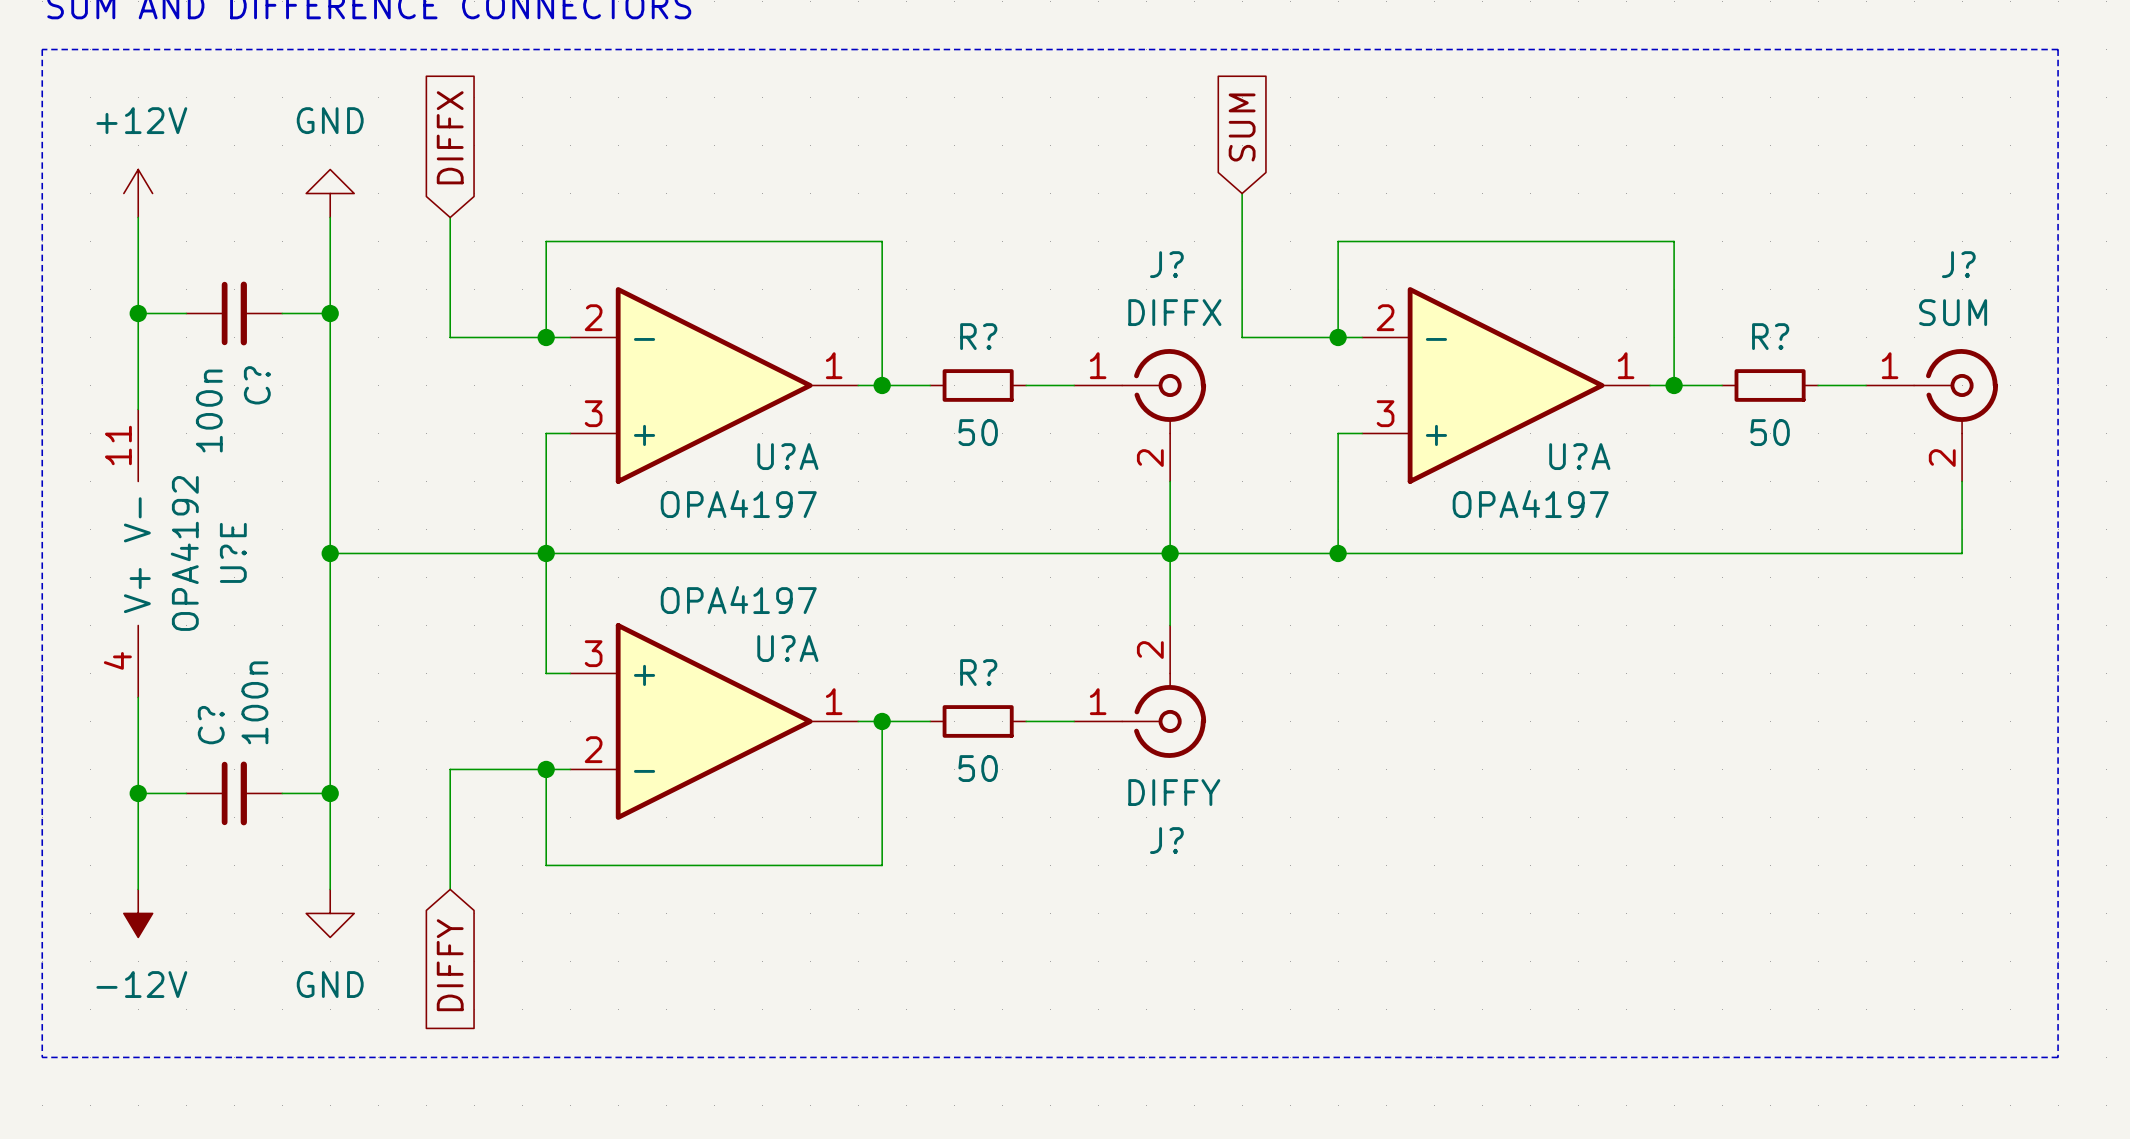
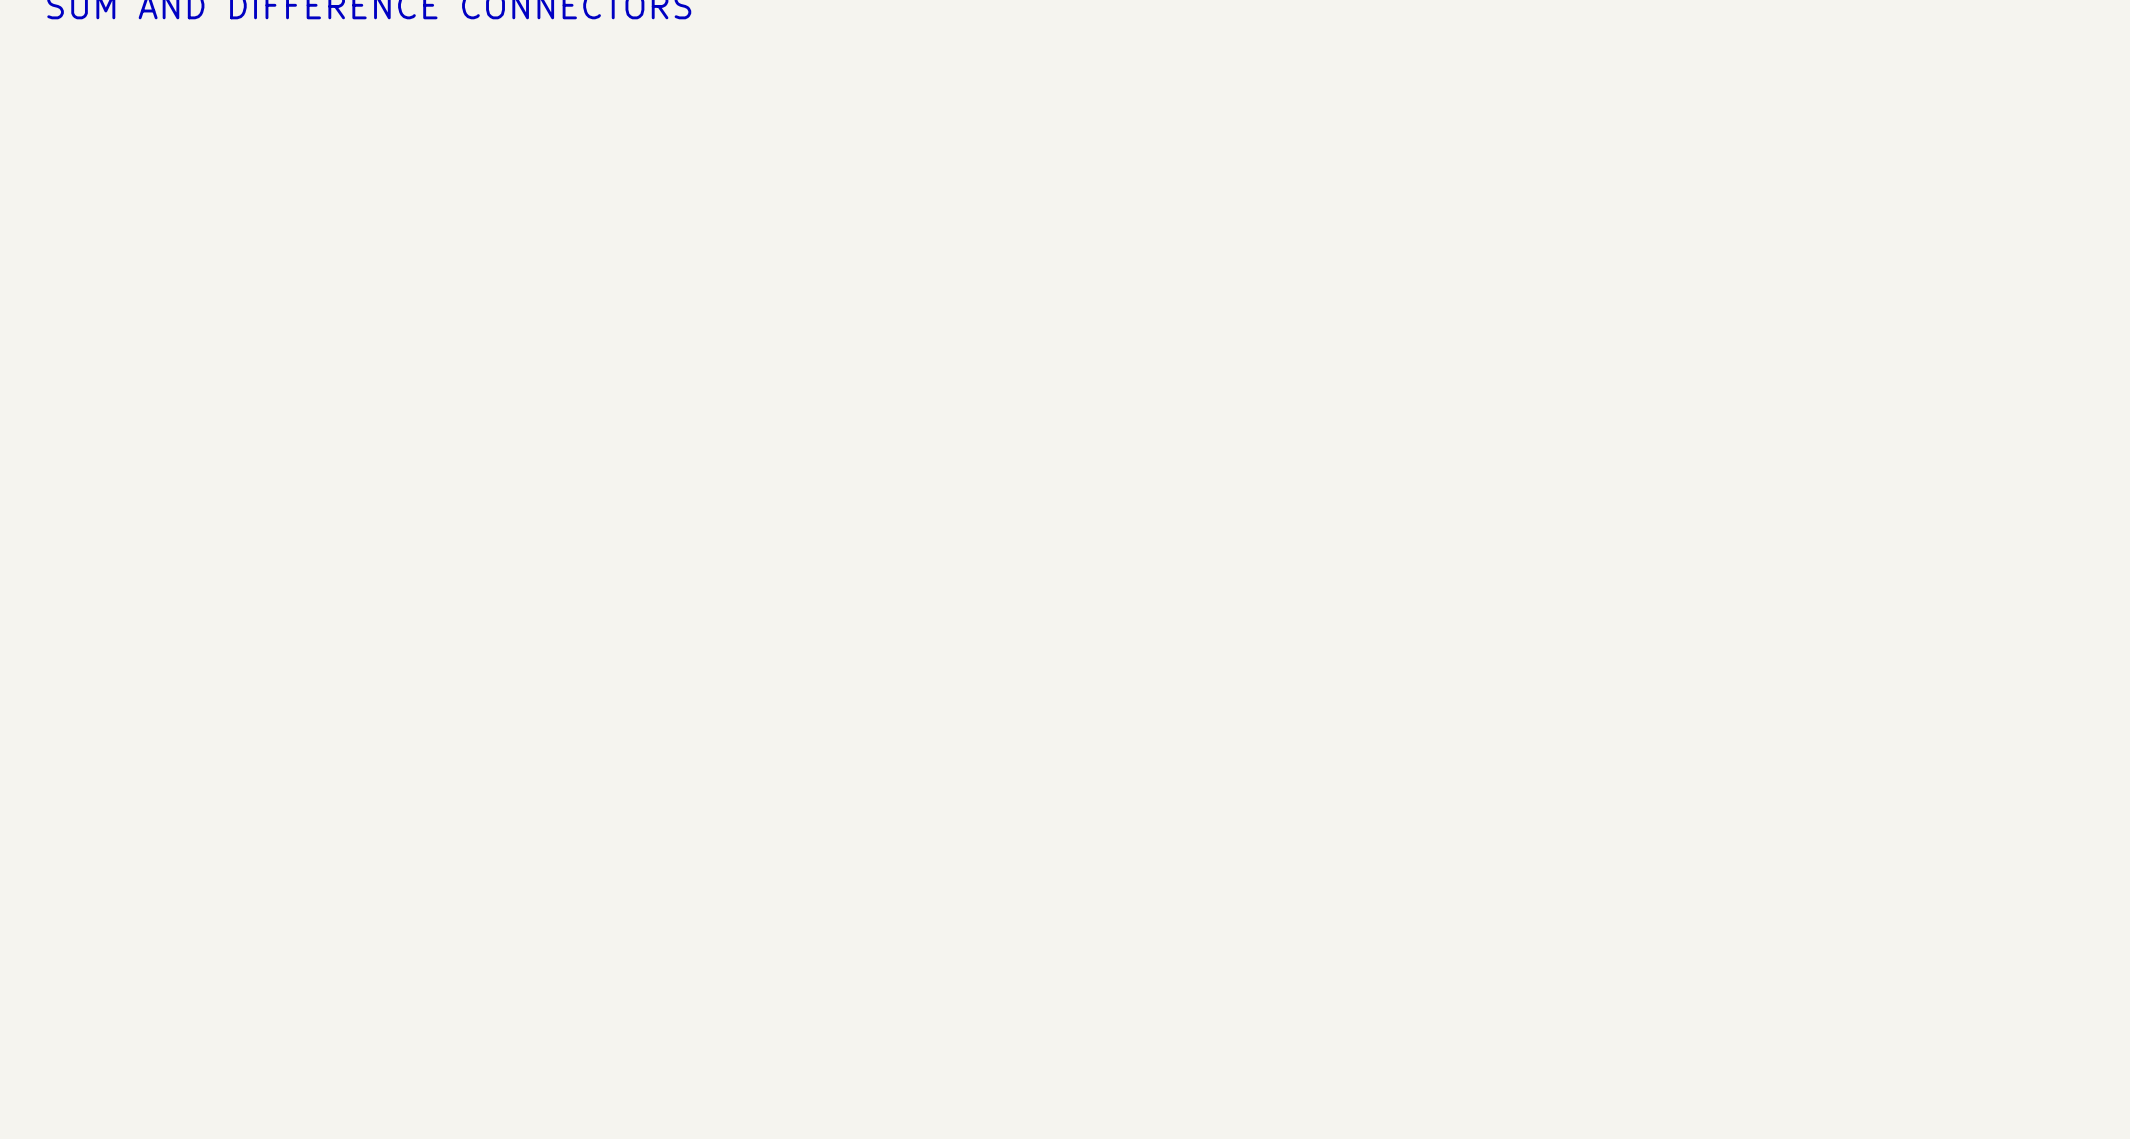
line: (42, 49) (2058, 49) (2058, 1057) (42, 1057) (42, 49) -> none
global label: SUM (1242, 127) -> none
global label: DIFFX (450, 137) -> none
power symbol: +12V (138, 193) -> none
power symbol: GND (330, 193) -> none
wire: (1242, 193) (1242, 337) (1362, 337) -> none
wire: (138, 217) (138, 409) -> none
wire: (330, 217) (330, 889) -> none
wire: (450, 217) (450, 337) (570, 337) -> none
wire: (138, 313) (186, 313) -> none
junction: (138, 313) -> none
C?: 100n (234, 313) -> none
wire: (282, 313) (330, 313) -> none
junction: (330, 313) -> none
wire: (546, 337) (546, 241) (882, 241) (882, 385) -> none
junction: (546, 337) -> none
wire: (1338, 337) (1338, 241) (1674, 241) (1674, 385) -> none
junction: (1338, 337) -> none
U?A: OPA4197 (714, 385) -> none
wire: (858, 385) (930, 385) -> none
junction: (882, 385) -> none
R?: 50 (978, 385) -> none
wire: (1026, 385) (1074, 385) -> none
U?A: OPA4197 (1506, 385) -> none
wire: (1650, 385) (1722, 385) -> none
junction: (1674, 385) -> none
R?: 50 (1770, 385) -> none
wire: (1818, 385) (1866, 385) -> none
J?: DIFFX (1140, 415) -> none
J?: SUM (1932, 415) -> none
wire: (570, 433) (546, 433) (546, 673) (570, 673) -> none
wire: (1362, 433) (1338, 433) (1338, 553) -> none
wire: (1170, 481) (1170, 625) -> none
wire: (1962, 481) (1962, 553) (330, 553) -> none
U?E: OPA4192 (138, 553) -> none
junction: (330, 553) -> none
junction: (546, 553) -> none
junction: (1170, 553) -> none
junction: (1338, 553) -> none
J?: DIFFY (1140, 691) -> none
wire: (138, 697) (138, 889) -> none
U?A: OPA4197 (714, 721) -> none
wire: (858, 721) (930, 721) -> none
wire: (882, 721) (882, 865) (546, 865) (546, 769) -> none
junction: (882, 721) -> none
R?: 50 (978, 721) -> none
wire: (1026, 721) (1074, 721) -> none
junction: (546, 769) -> none
wire: (570, 769) (450, 769) (450, 889) -> none
wire: (138, 793) (186, 793) -> none
junction: (138, 793) -> none
C?: 100n (234, 793) -> none
wire: (282, 793) (330, 793) -> none
junction: (330, 793) -> none
power symbol: -12V (138, 913) -> none
power symbol: GND (330, 913) -> none
global label: DIFFY (450, 965) -> none

